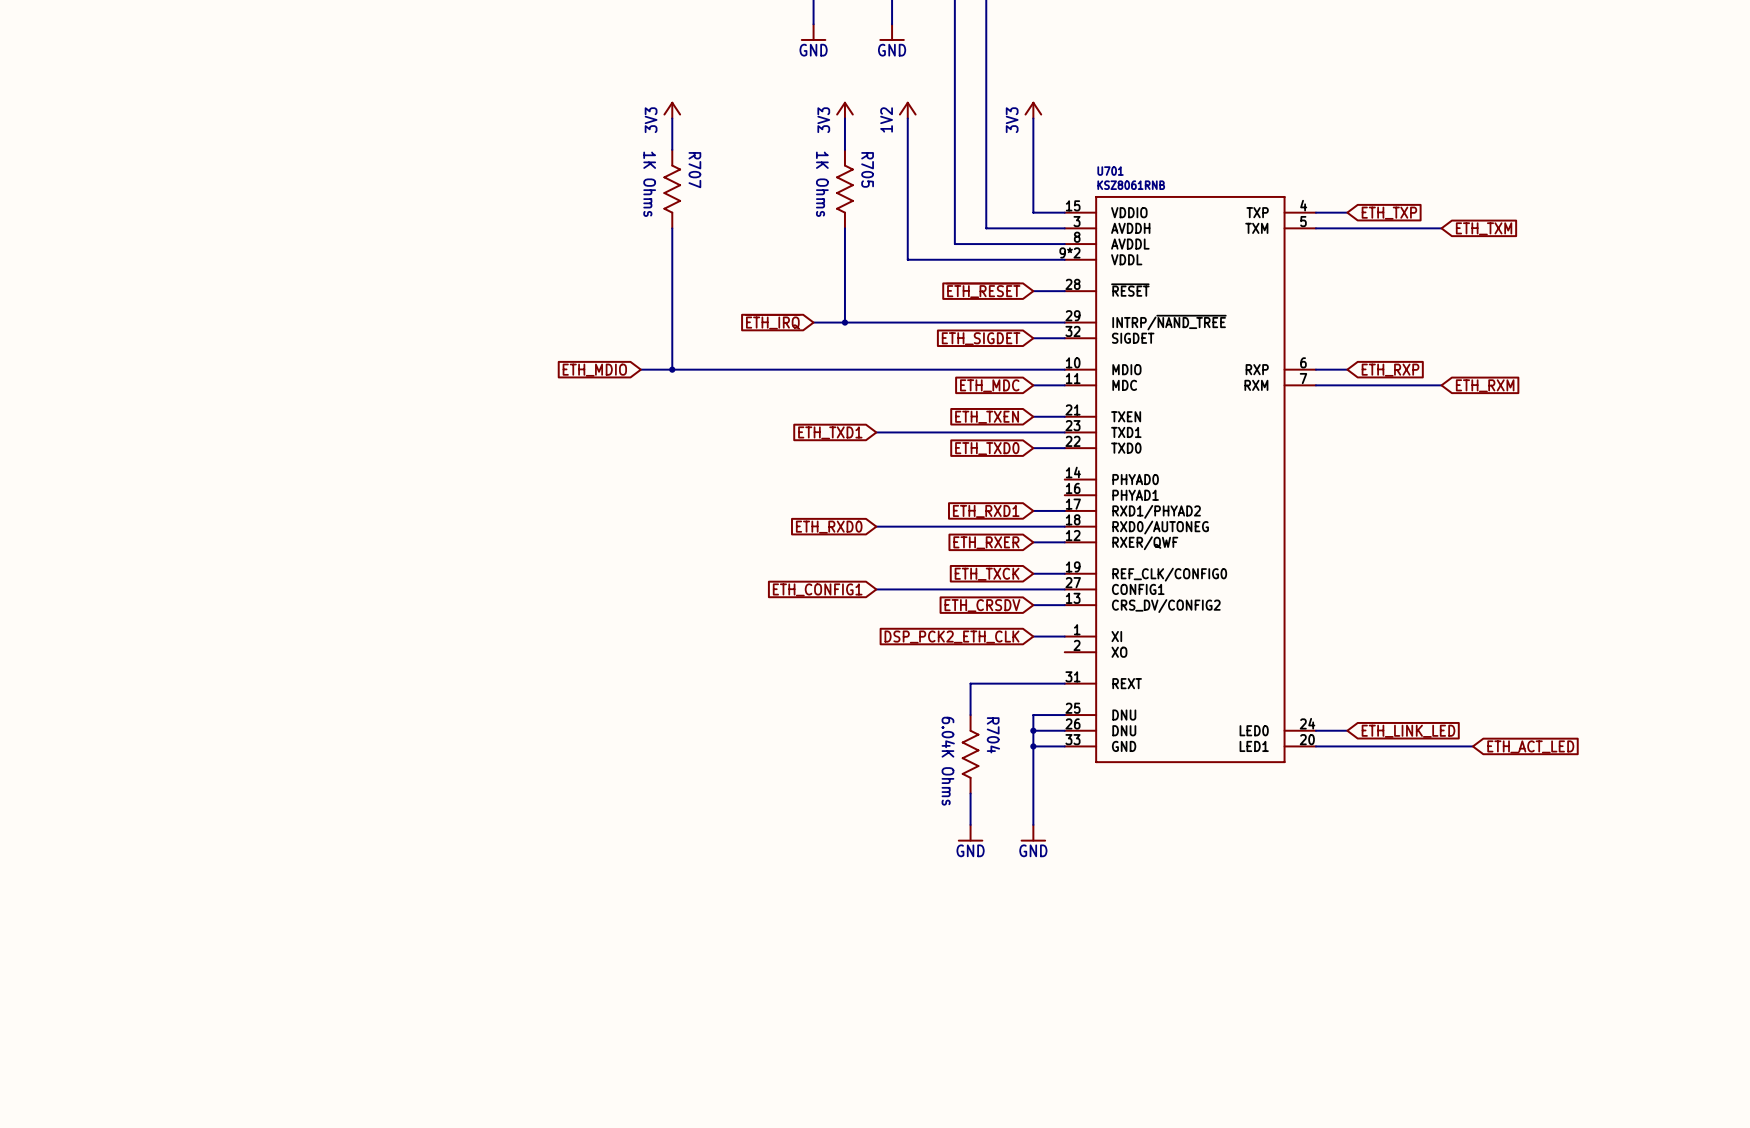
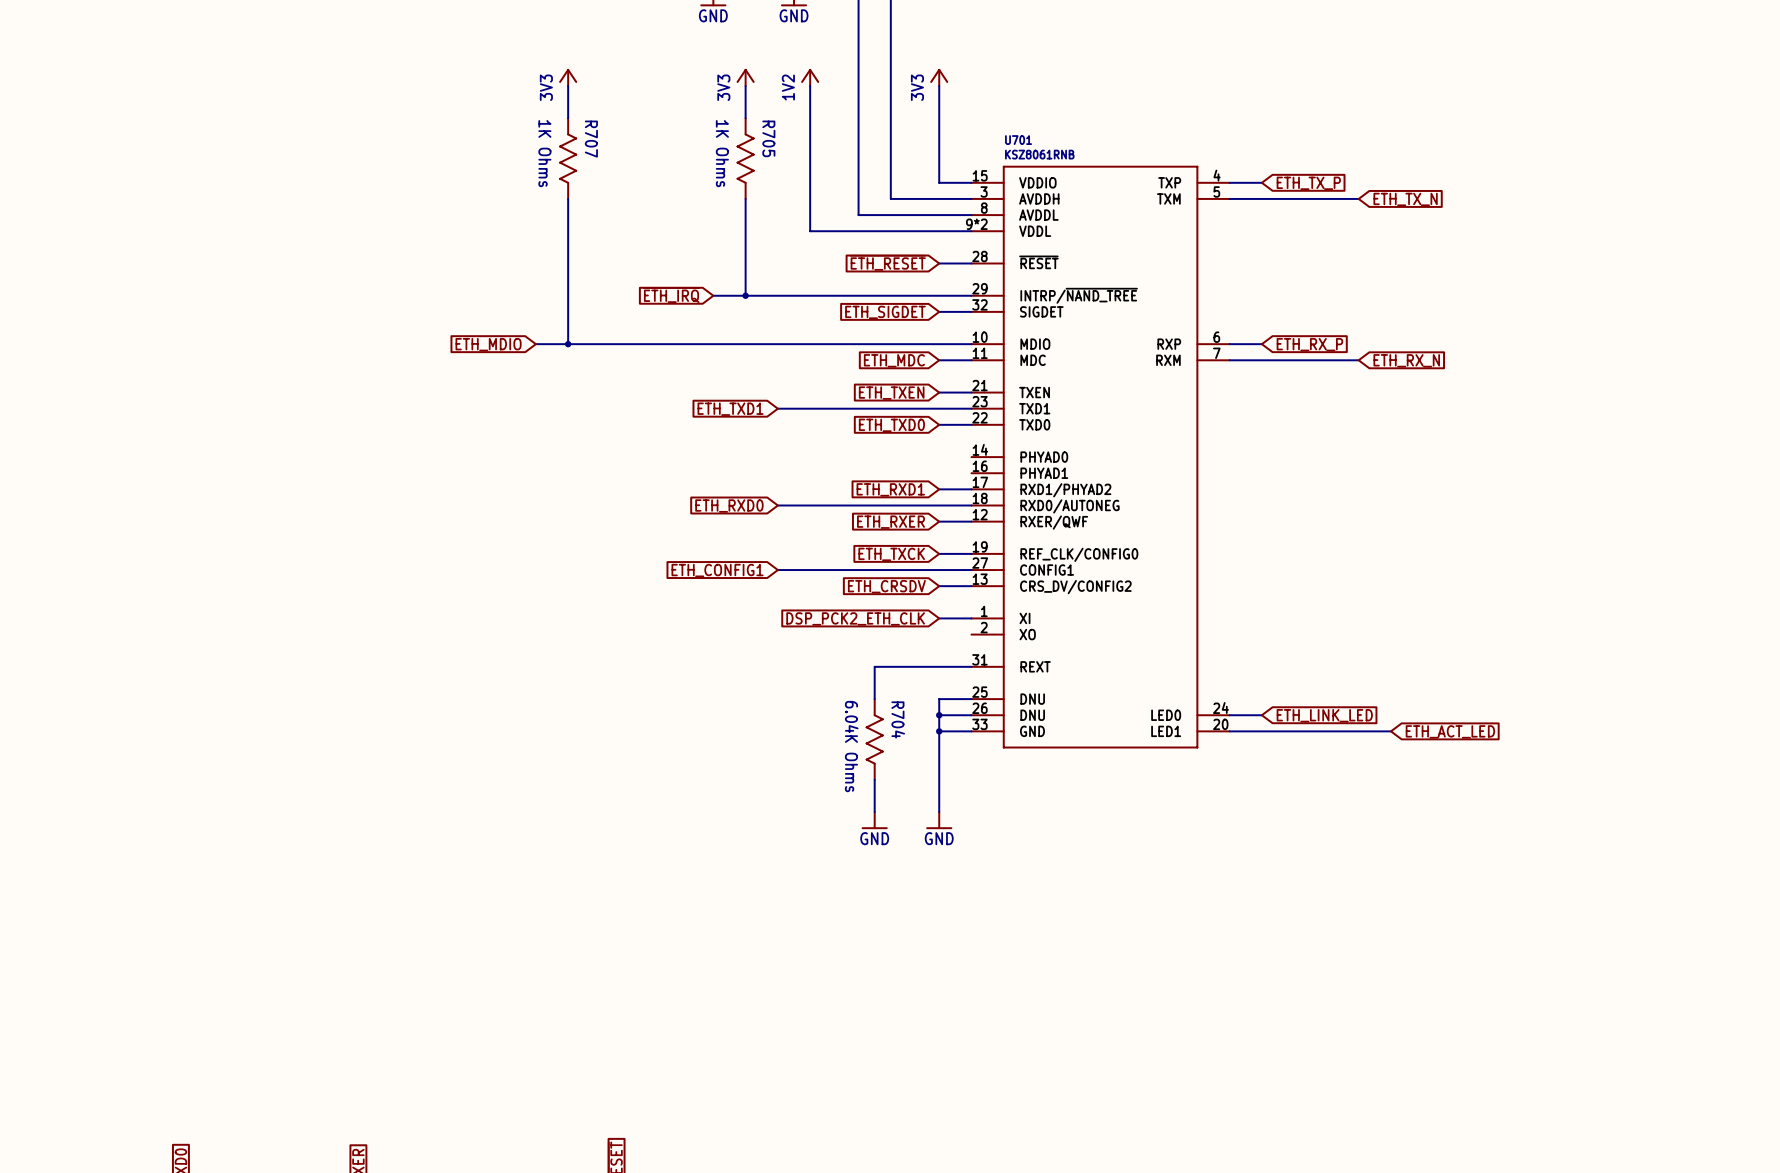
global label: ETH_TXP (1389, 213) -> ETH_TX_P (1308, 183)
global label: ETH_TXM (1484, 228) -> ETH_TX_N (1405, 199)
global label: ETH_RXP (1390, 370) -> ETH_RX_P (1309, 344)
global label: ETH_RXM (1485, 385) -> ETH_RX_N (1406, 360)

